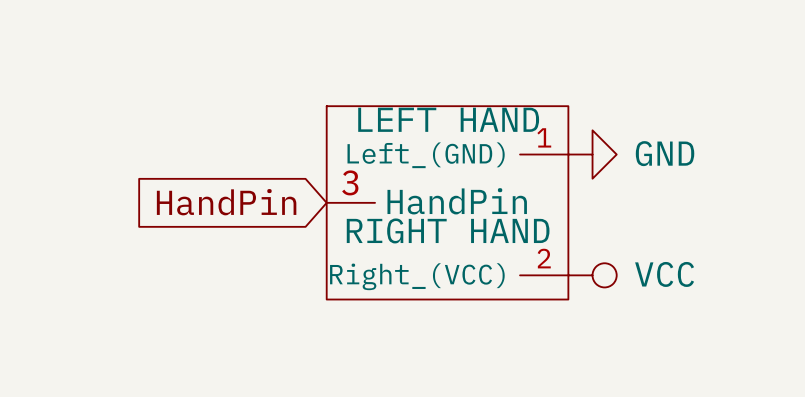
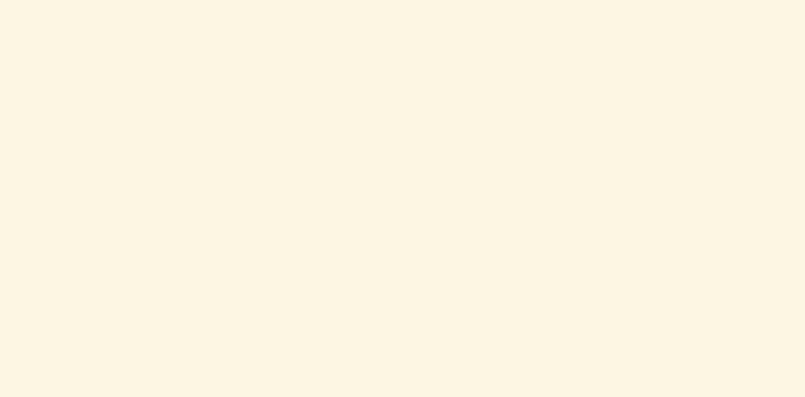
power symbol: GND (592, 154) -> none
global label: HandPin (226, 202) -> none
part: (447, 202) -> none
power symbol: VCC (592, 275) -> none

